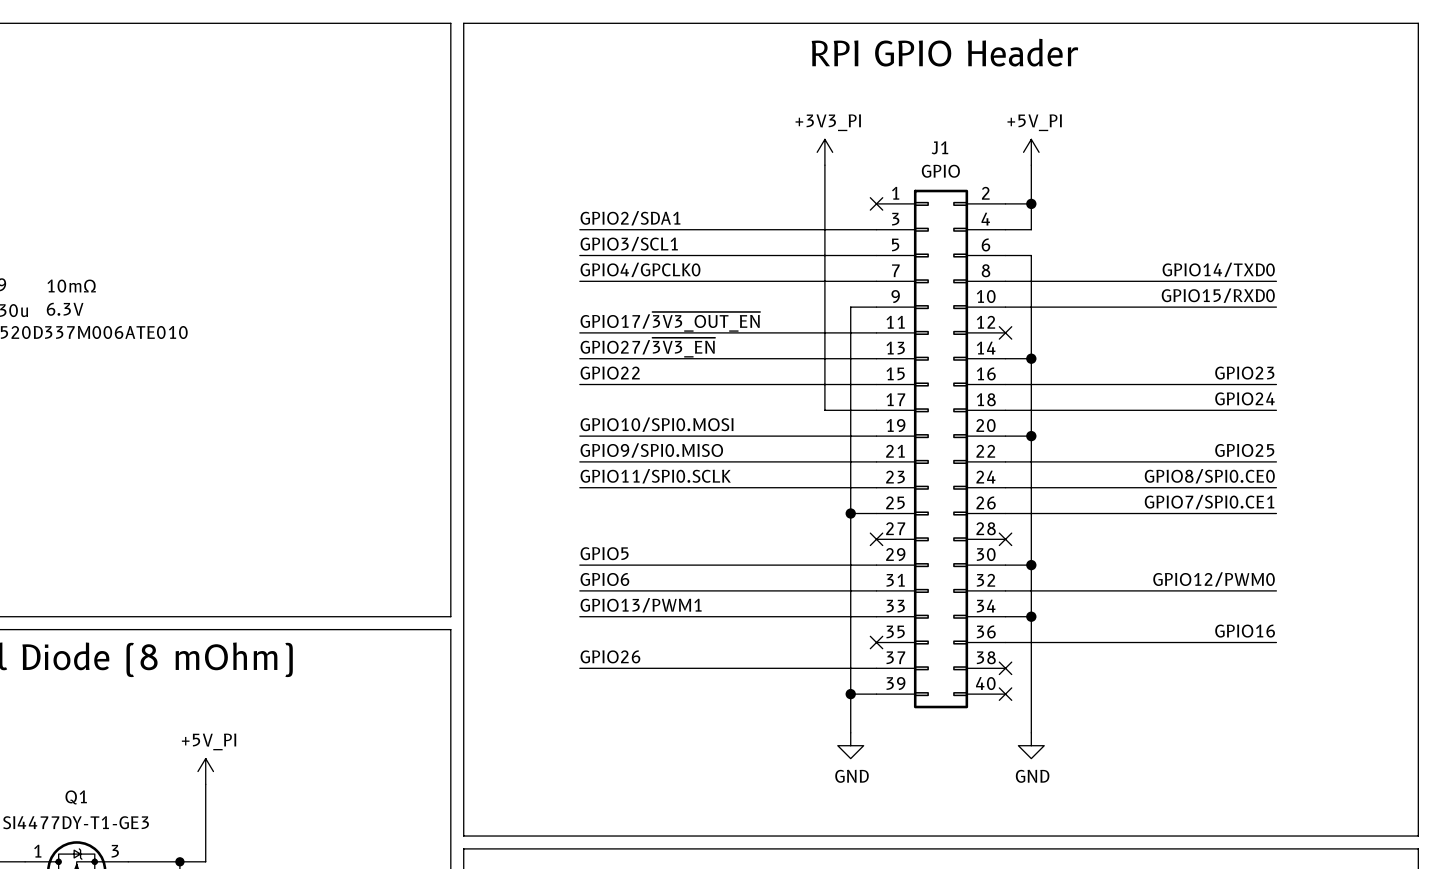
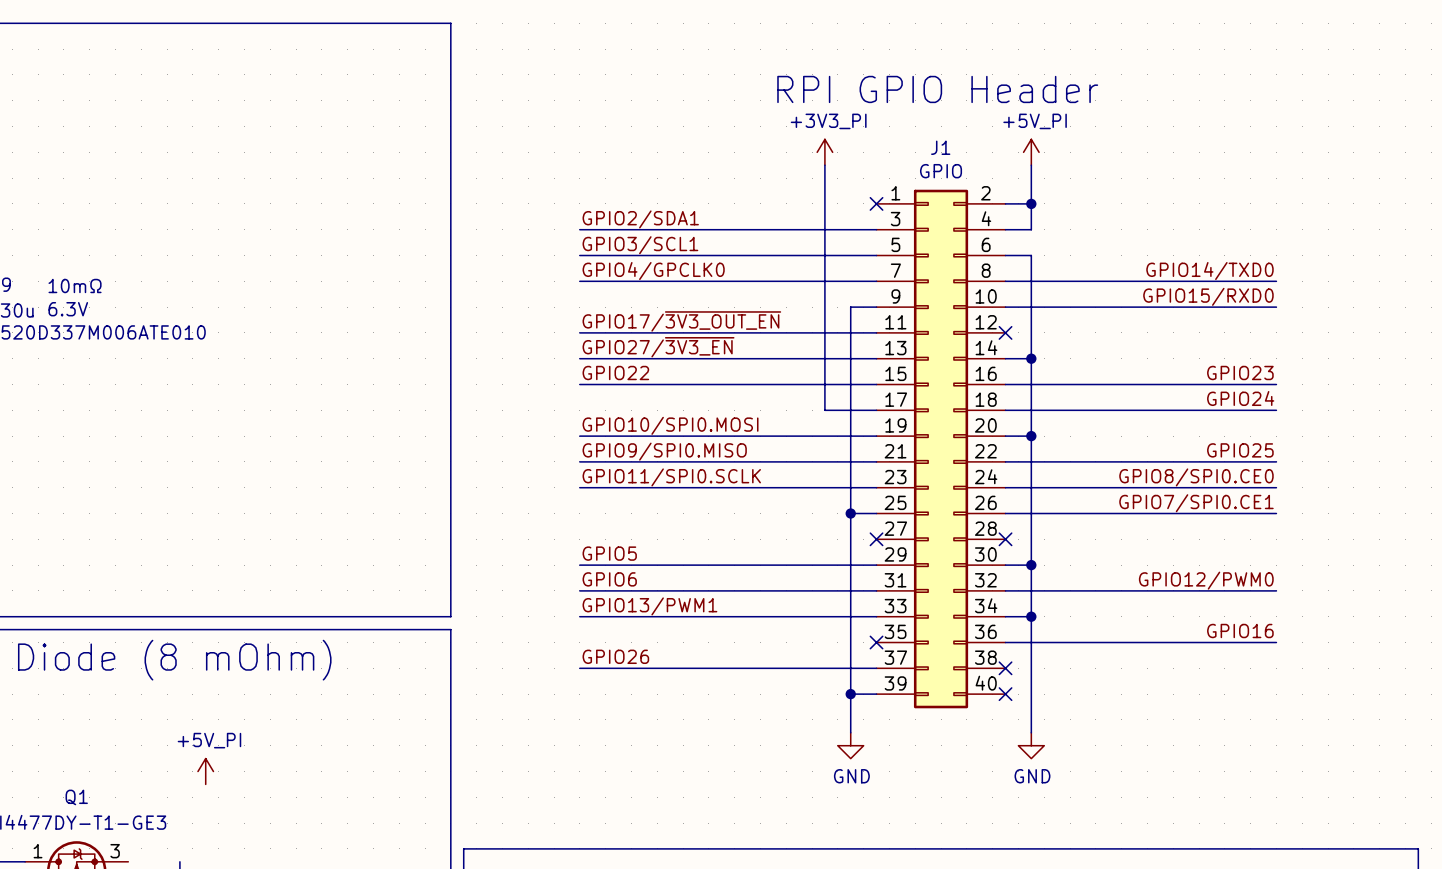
line: (463, 23) (1418, 23) (1418, 836) (463, 836) (463, 23) -> none
text position: RPI GPIO Header (944, 52) -> RPI GPIO Header (937, 89)
wire: (205, 784) (205, 861) (128, 861) -> none
junction: (179, 861) -> none

